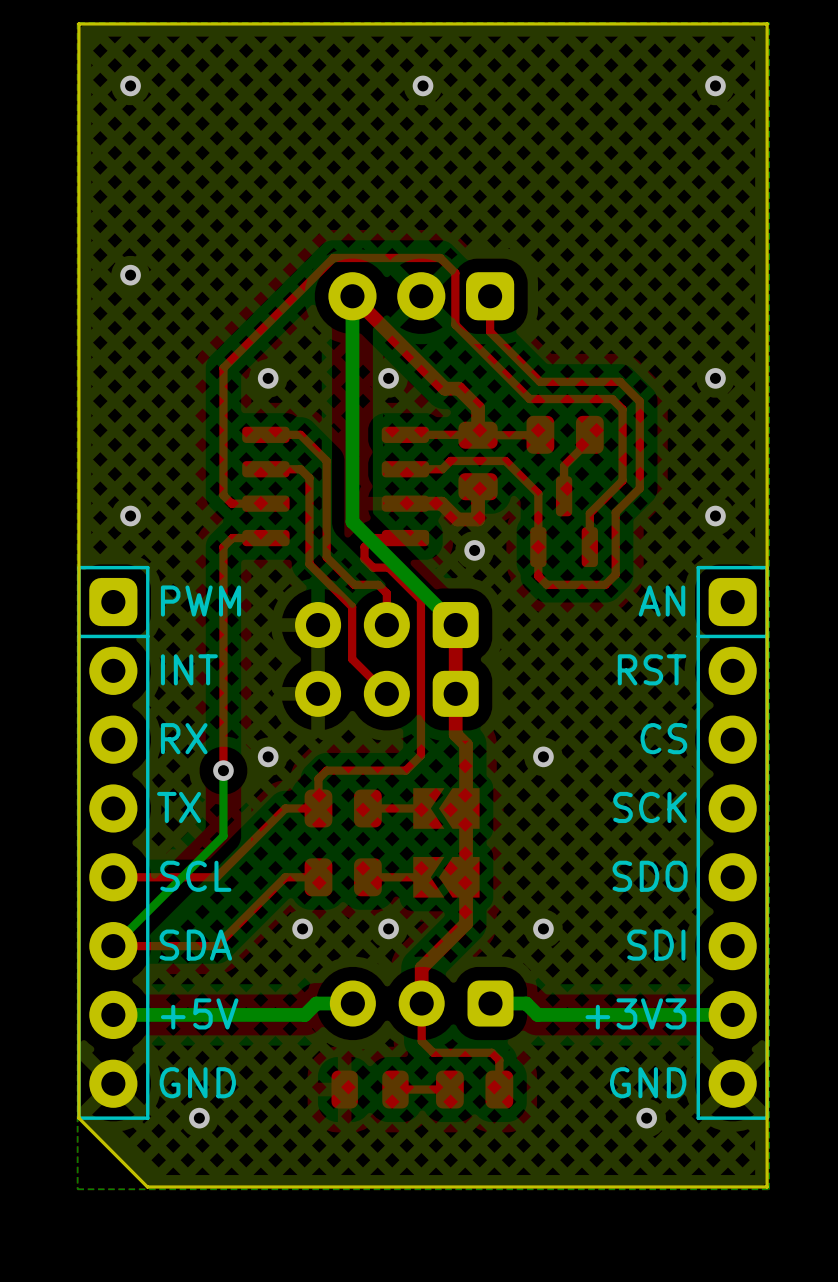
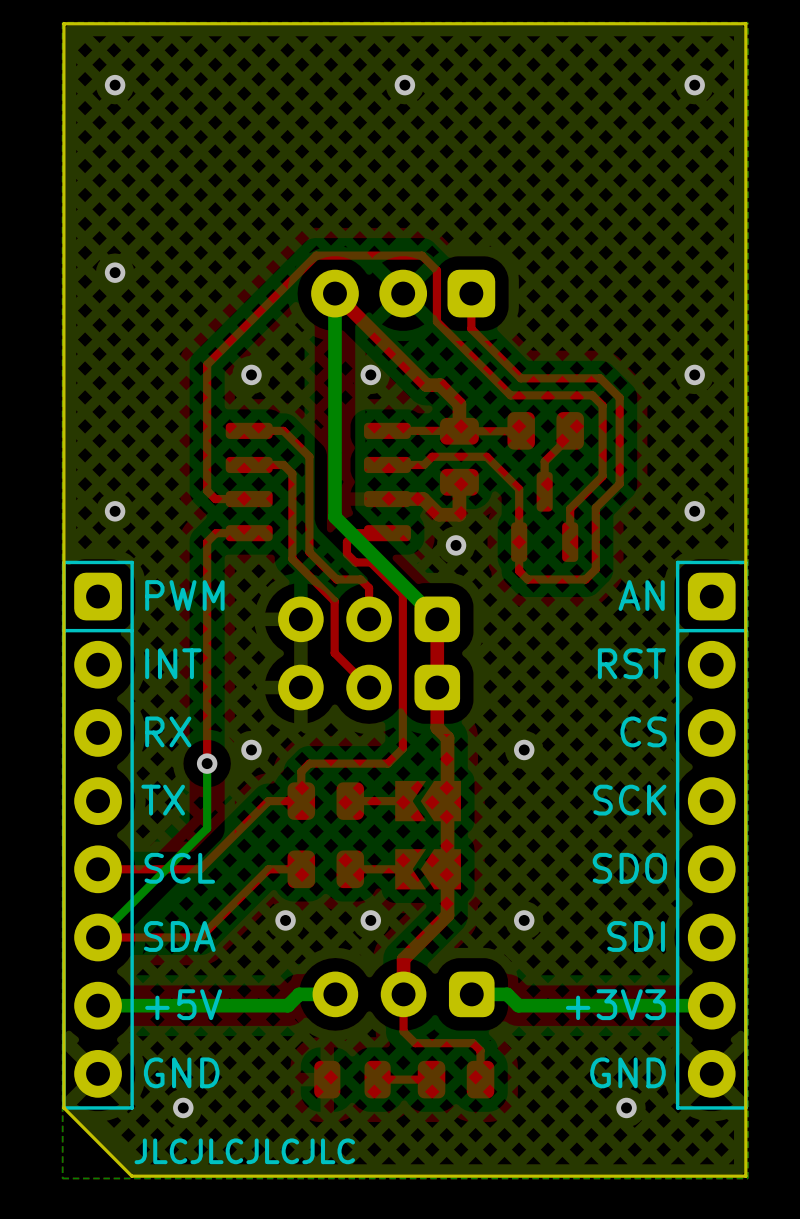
text: none -> JLCJLCJLCJLC (244, 1151)

